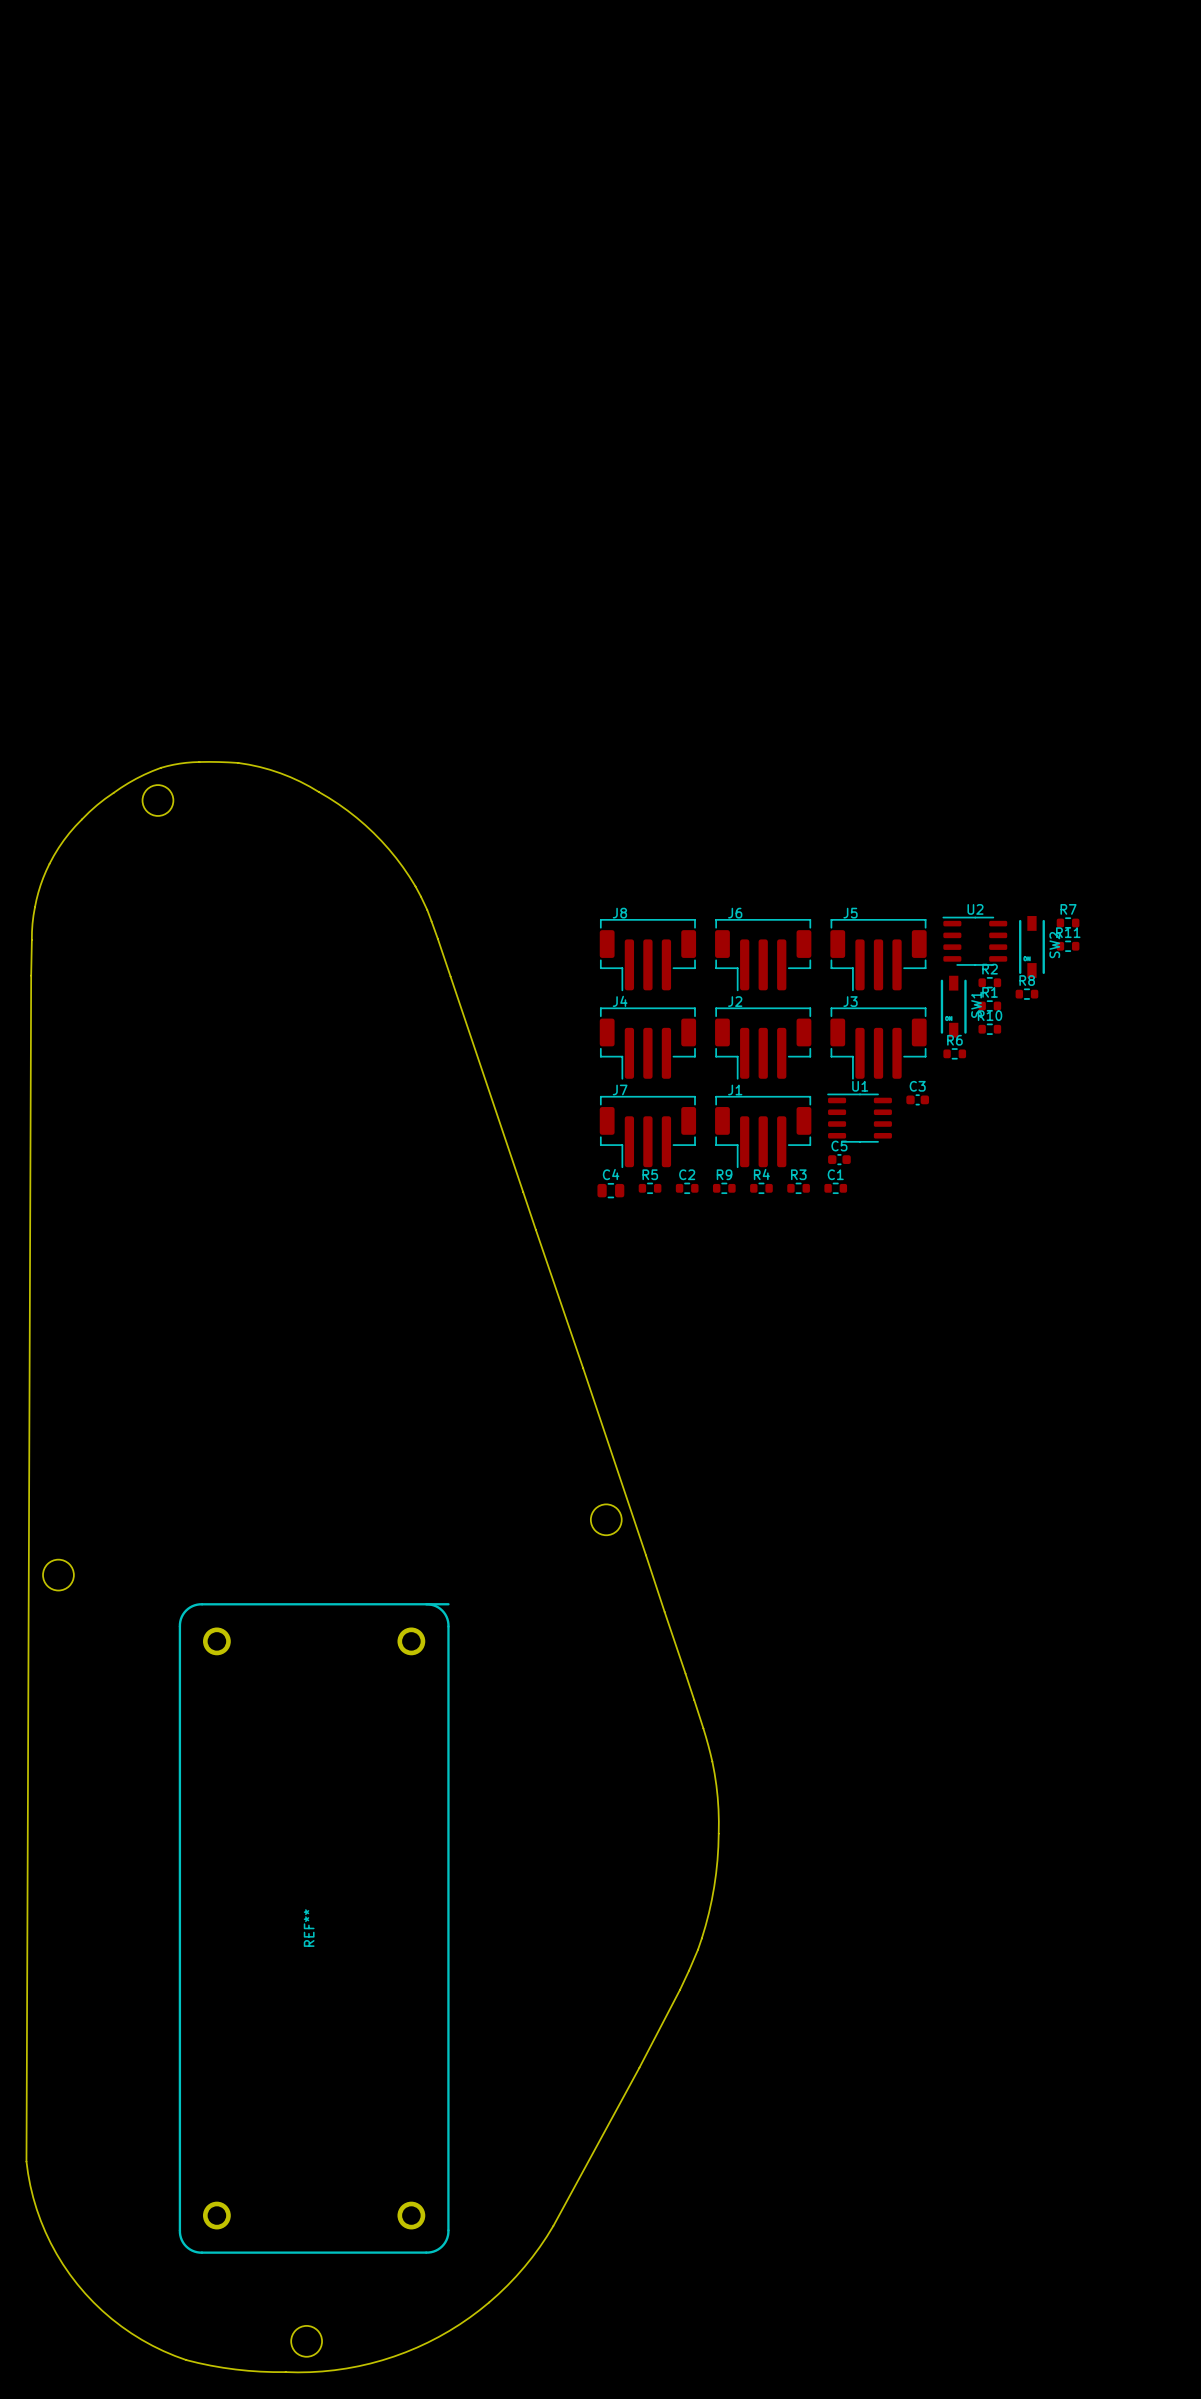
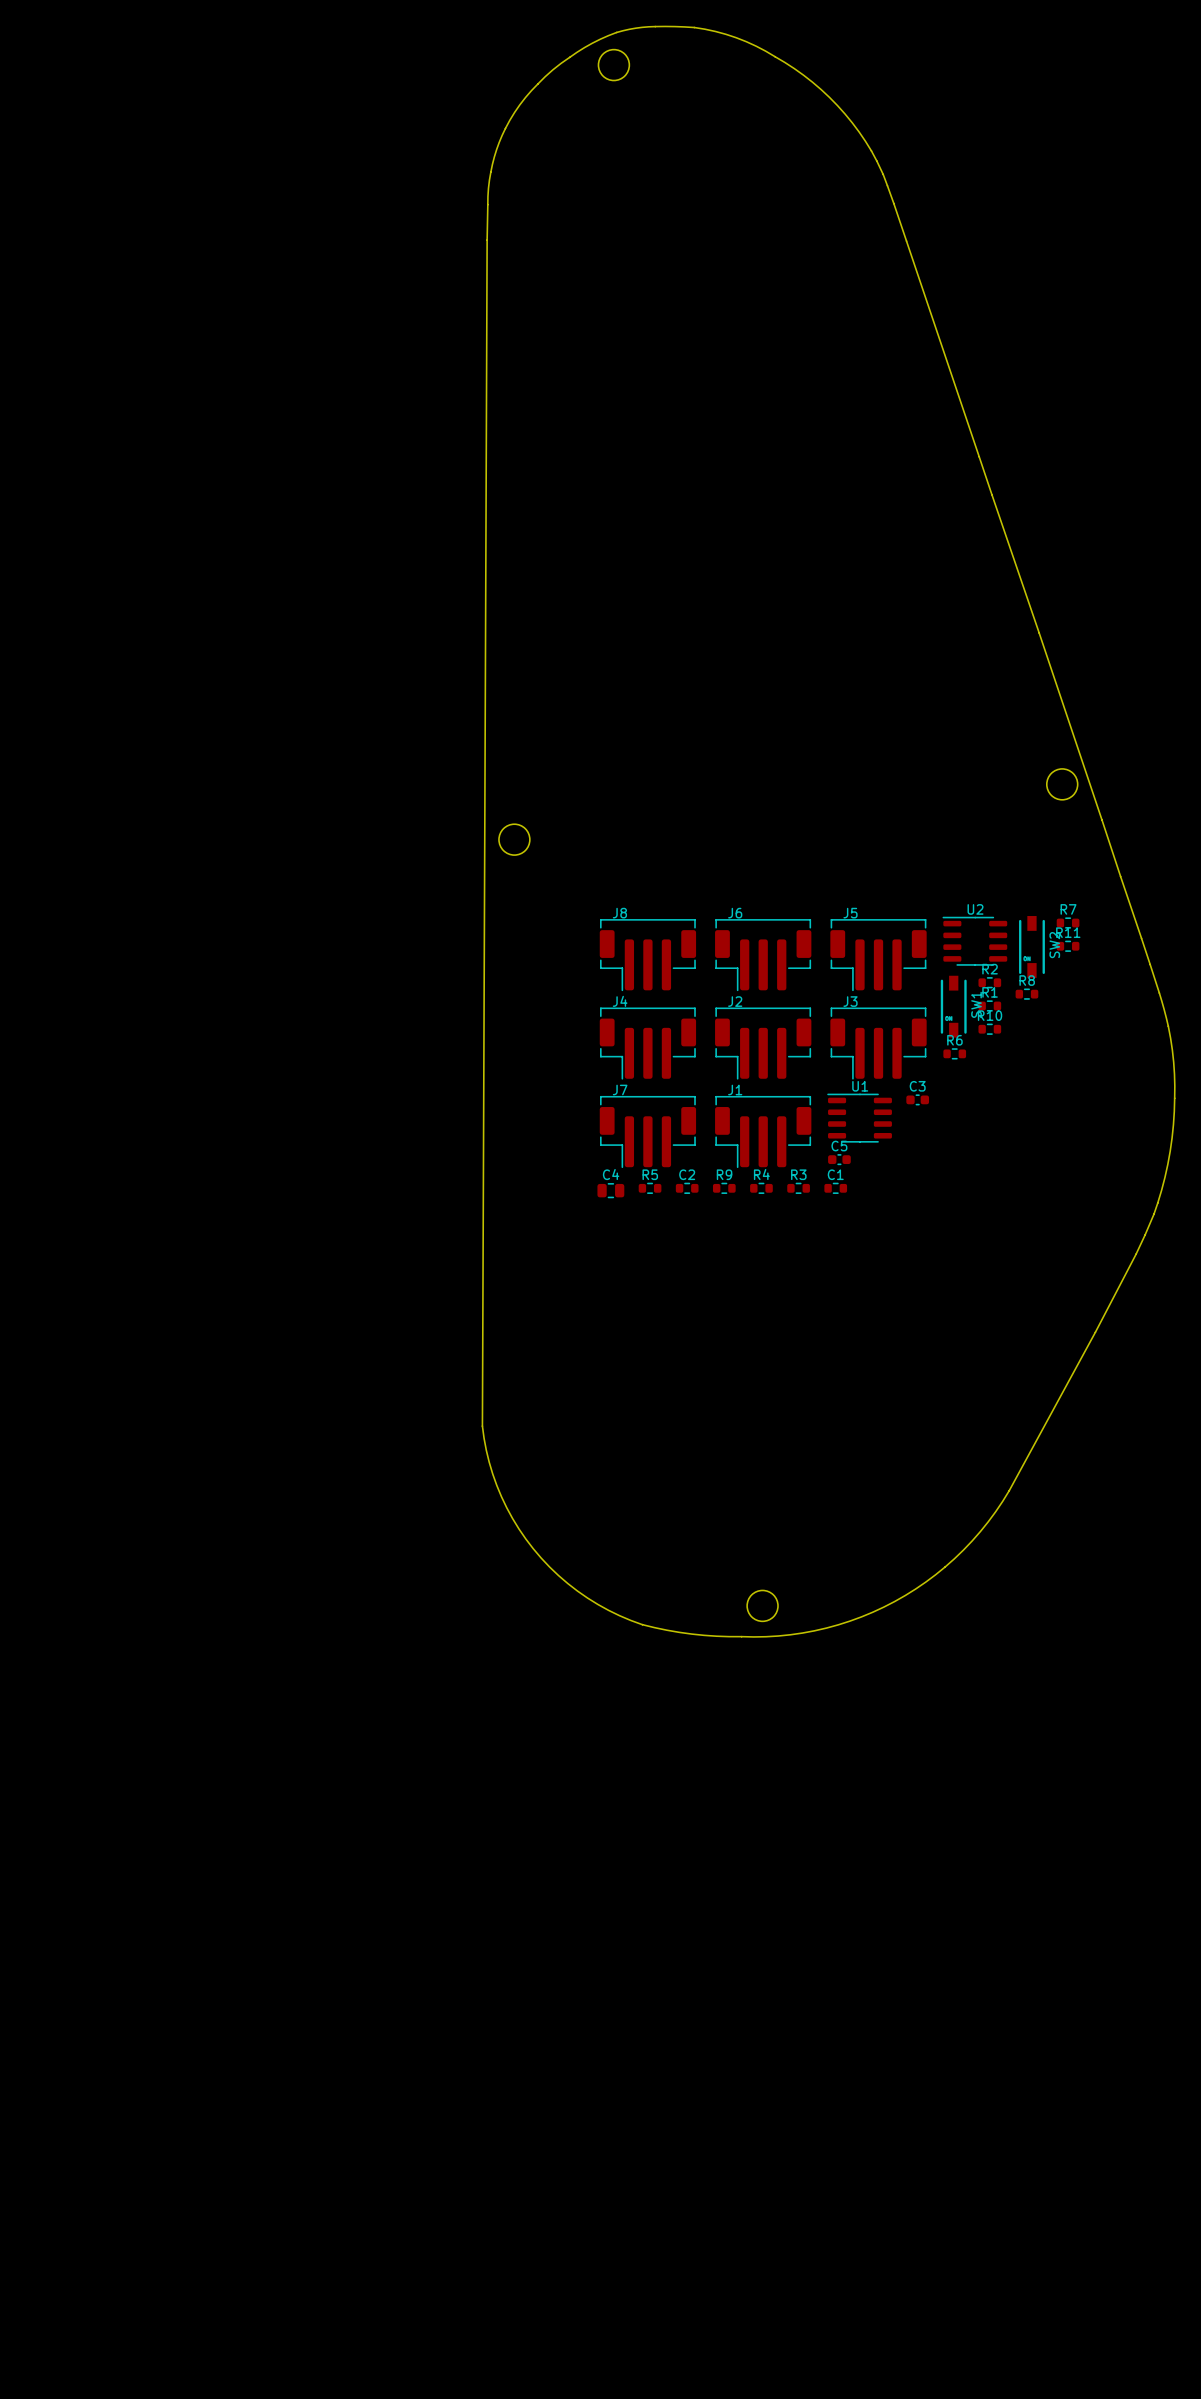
board edge: none -> (655, 26) (623, 30) (600, 39) (577, 52) (545, 76) (525, 97) (509, 120) (496, 149) (489, 180) (487, 240) (482, 1426) (492, 1473) (512, 1518) (541, 1558) (577, 1591) (619, 1615) (654, 1627) (716, 1636) (778, 1636) (802, 1633) (838, 1624) (872, 1612) (905, 1595) (935, 1574) (954, 1558) (972, 1540) (995, 1511) (1009, 1490) (1095, 1332) (1136, 1254) (1153, 1214) (1164, 1177) (1172, 1138) (1174, 1098) (1173, 1062) (1166, 1017) (1150, 964) (893, 203) (876, 161) (859, 131) (837, 105) (812, 82) (784, 62) (756, 46) (726, 34) (694, 27) (655, 26)
round board edge: none -> [598, 49, 630, 81]
board edge: (199, 762) (167, 766) (144, 774) (121, 787) (89, 812) (69, 833) (53, 855) (40, 885) (33, 915) (31, 975) (26, 2161) (36, 2209) (56, 2253) (85, 2293) (121, 2326) (163, 2351) (198, 2363) (260, 2371) (322, 2371) (358, 2366) (394, 2356) (427, 2342) (449, 2330) (479, 2310) (498, 2294) (524, 2266) (539, 2247) (553, 2226) (639, 2067) (680, 1989) (698, 1949) (708, 1912) (716, 1873) (718, 1833) (717, 1797) (710, 1753) (694, 1700) (437, 938) (420, 896) (403, 867) (381, 841) (356, 817) (328, 797) (300, 781) (270, 769) (238, 762) (199, 762) -> none
round board edge: none -> [1046, 768, 1079, 801]
round board edge: [142, 784, 174, 817] -> none
round board edge: none -> [498, 823, 531, 856]
round board edge position: (606, 1519) -> (762, 1605)
round board edge: [42, 1559, 75, 1591] -> none
REF**: (314, 1928) -> none
round board edge: [290, 2325, 323, 2358] -> none

